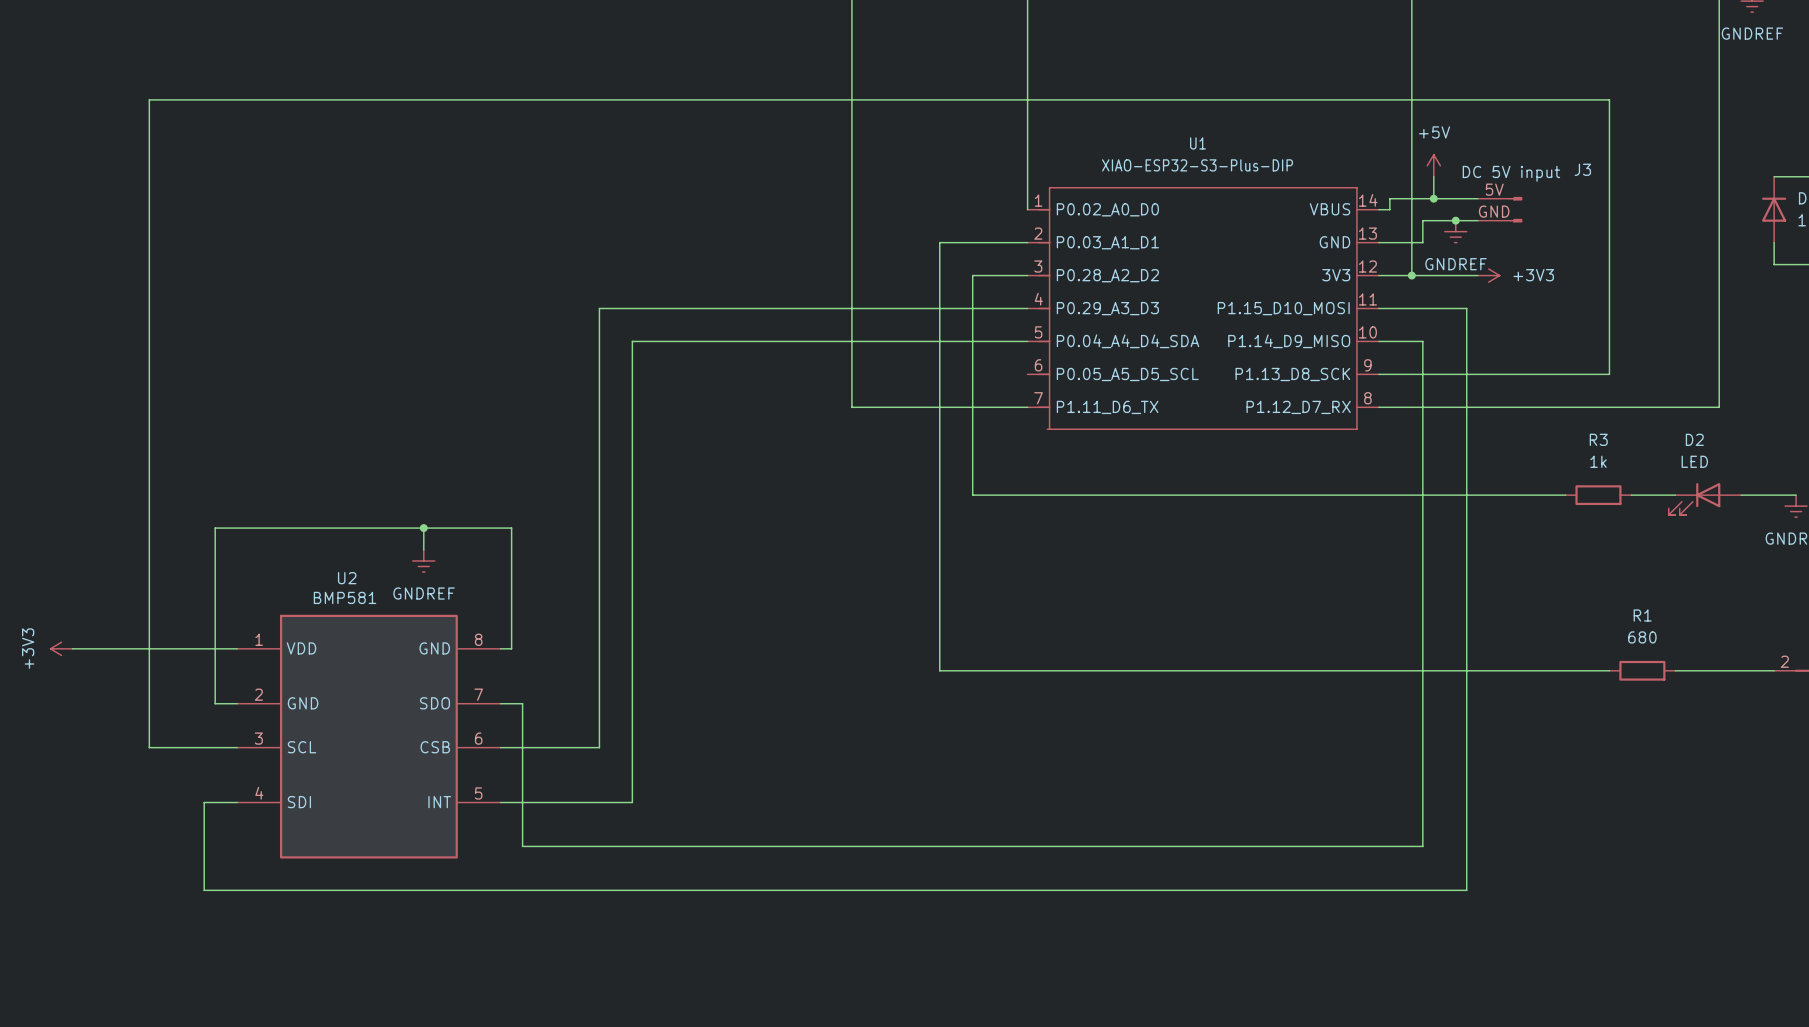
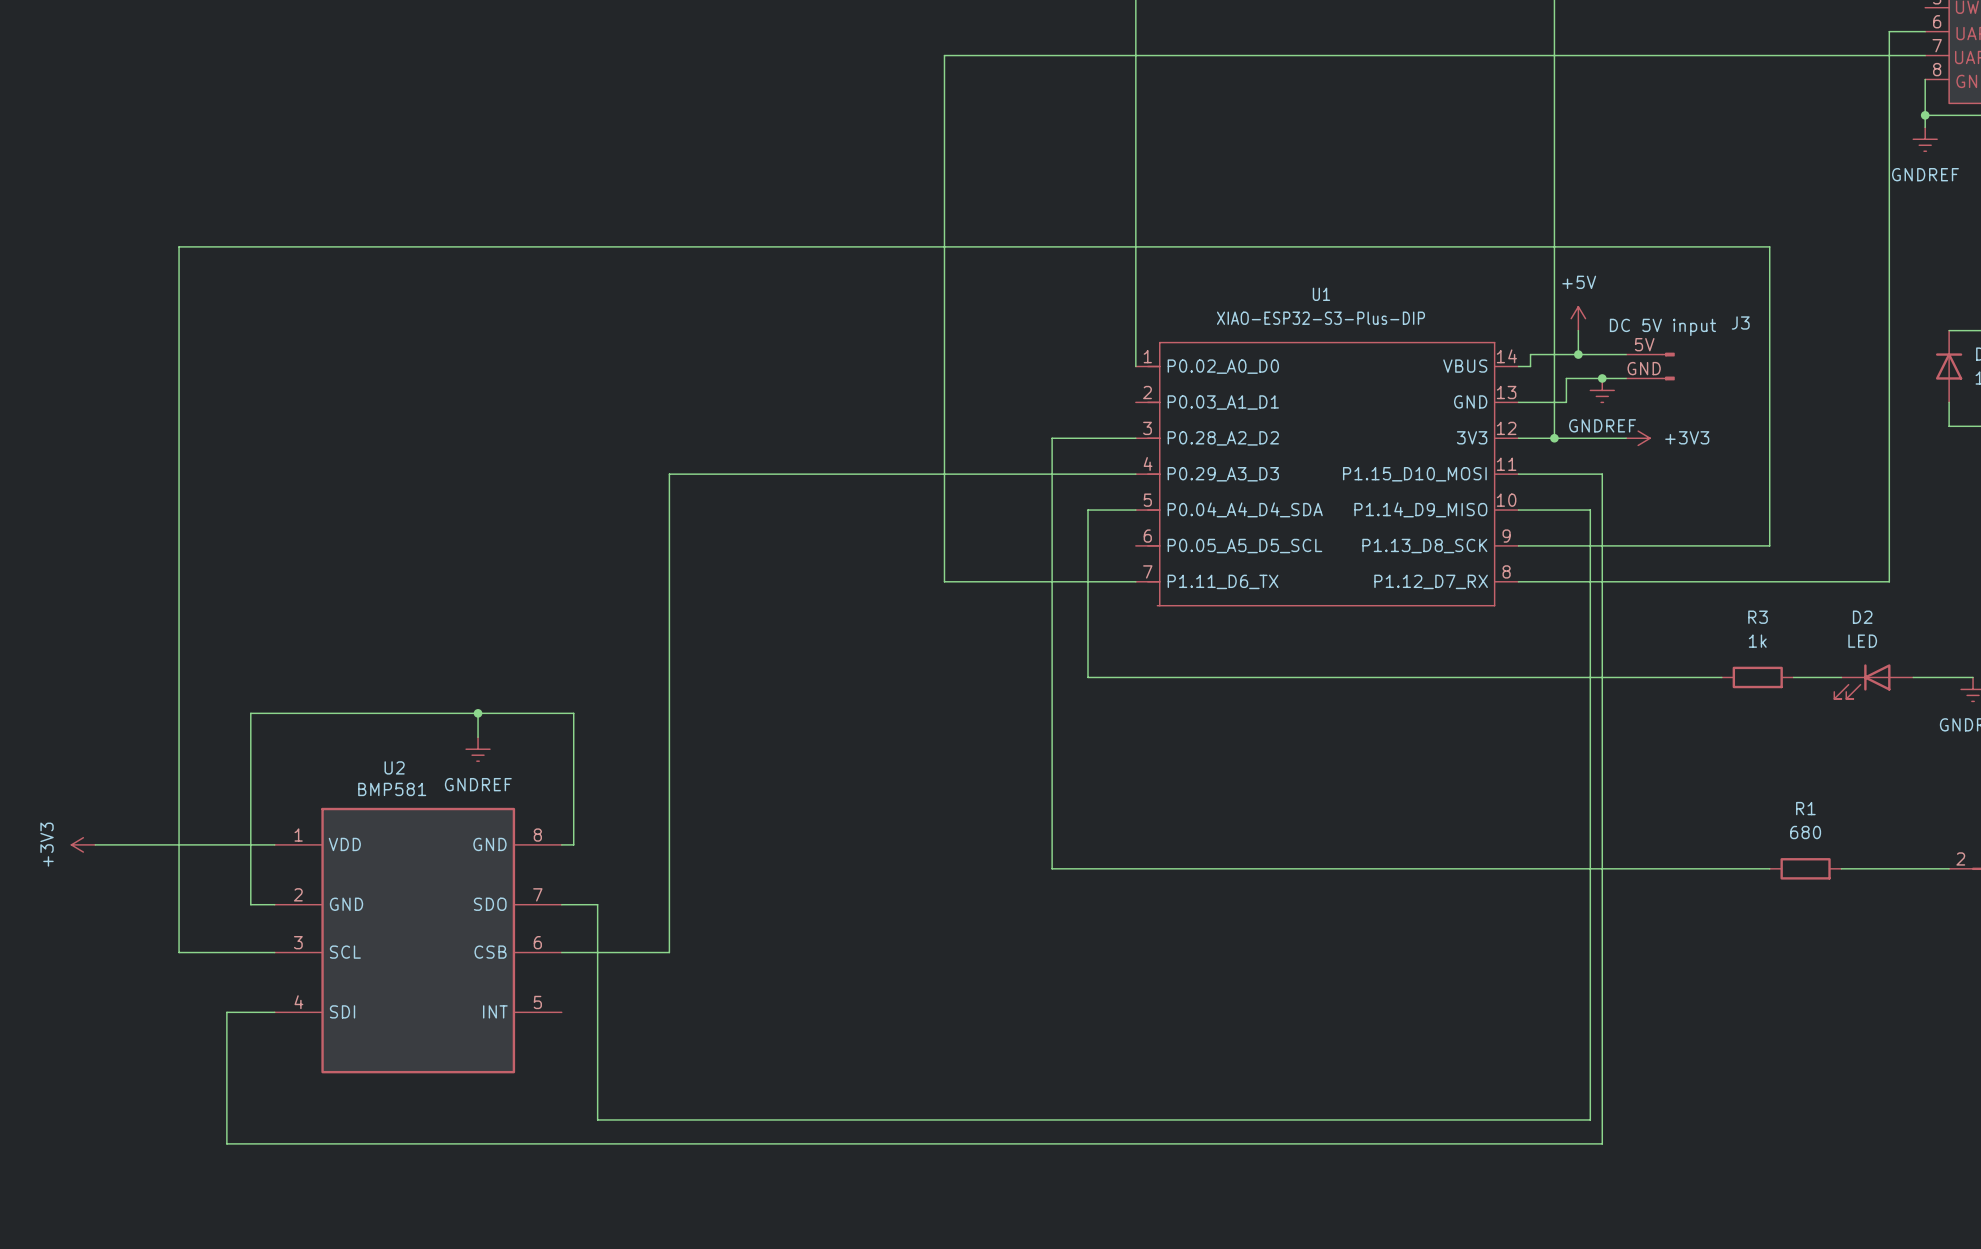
wire: (1027, 242) (939, 242) (939, 670) (950, 670) -> (1076, 438) (1052, 438) (1052, 868)
wire: (972, 275) (972, 495) (983, 495) -> (1087, 510) (1087, 677)
wire: (1455, 308) (1466, 308) (1466, 890) (204, 890) (204, 802) -> (1602, 474) (1602, 1143) (226, 1143) (226, 1012) (238, 1012)
wire: (983, 341) (632, 341) (632, 802) (500, 802) -> none
wire: (1422, 341) (1422, 846) (522, 846) (522, 703) -> (1566, 510) (1590, 510) (1590, 1119) (597, 1119) (597, 904) (585, 904)

